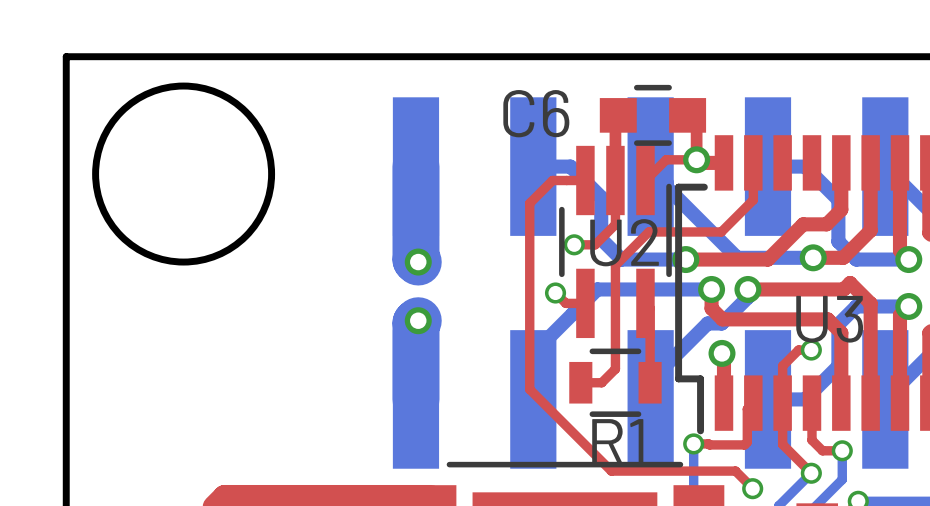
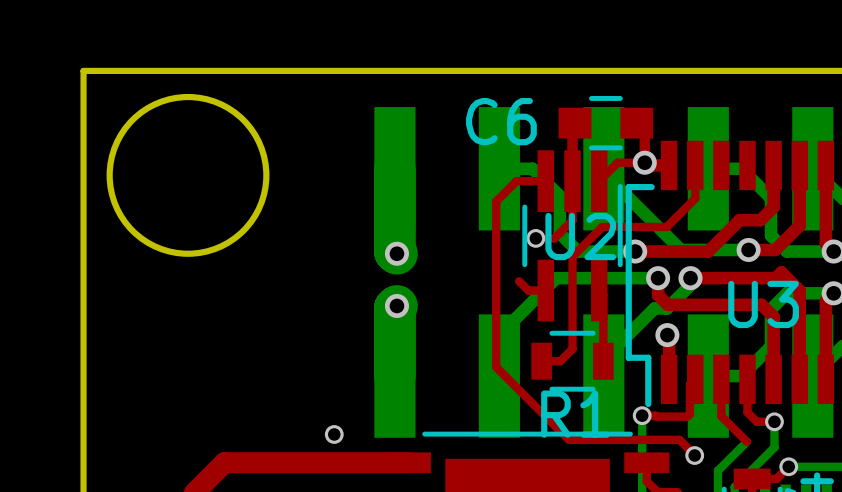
via: (555, 293) -> none
top track: (811, 350) (798, 350) (782, 366) (781, 404) -> none
via: (811, 350) -> none
via: none -> (334, 434)
via: (811, 473) -> none

